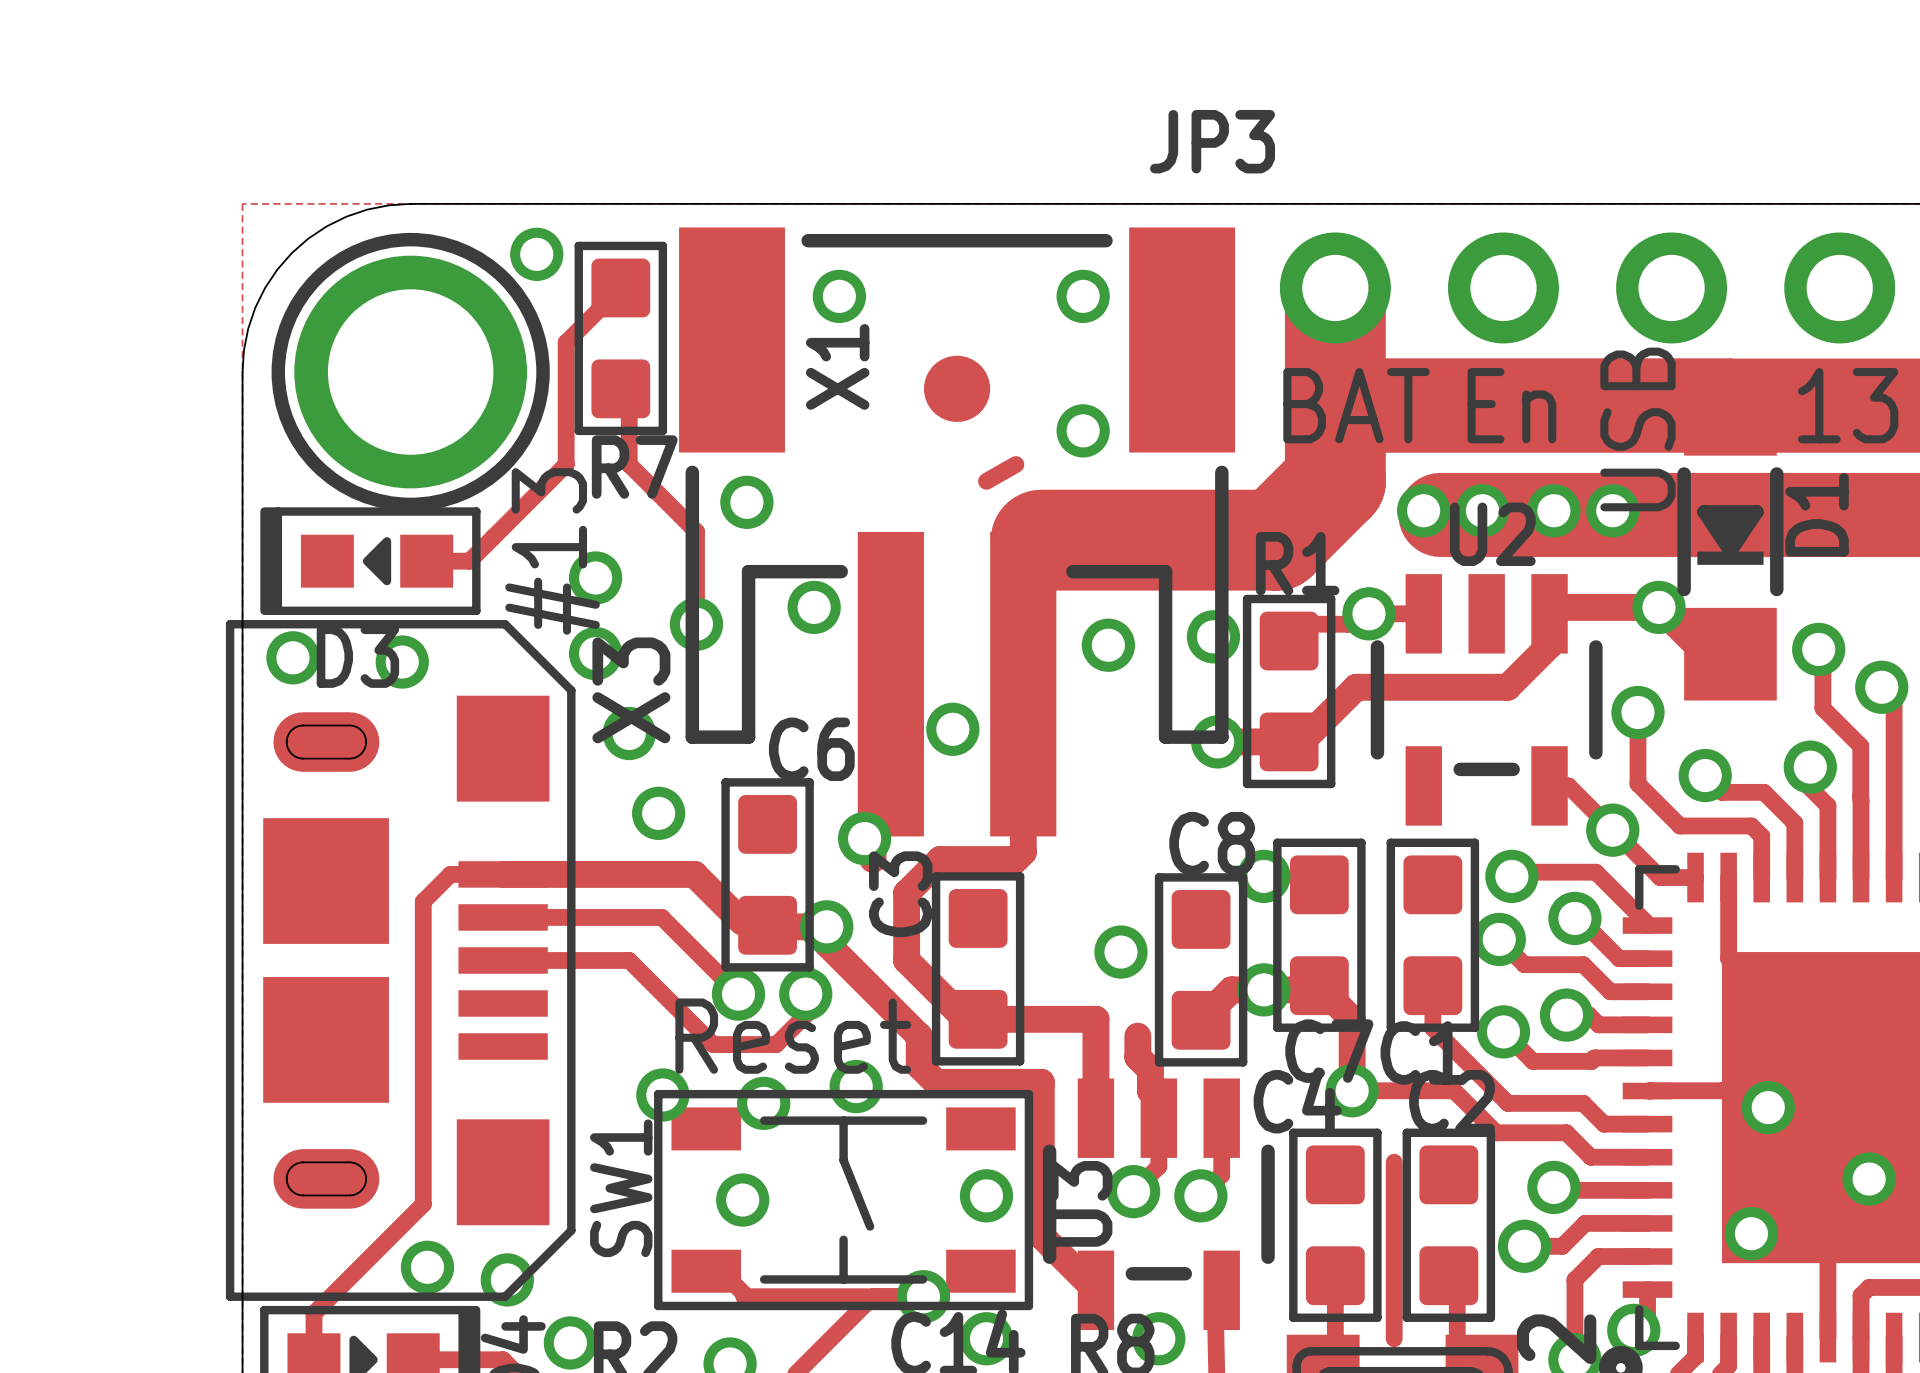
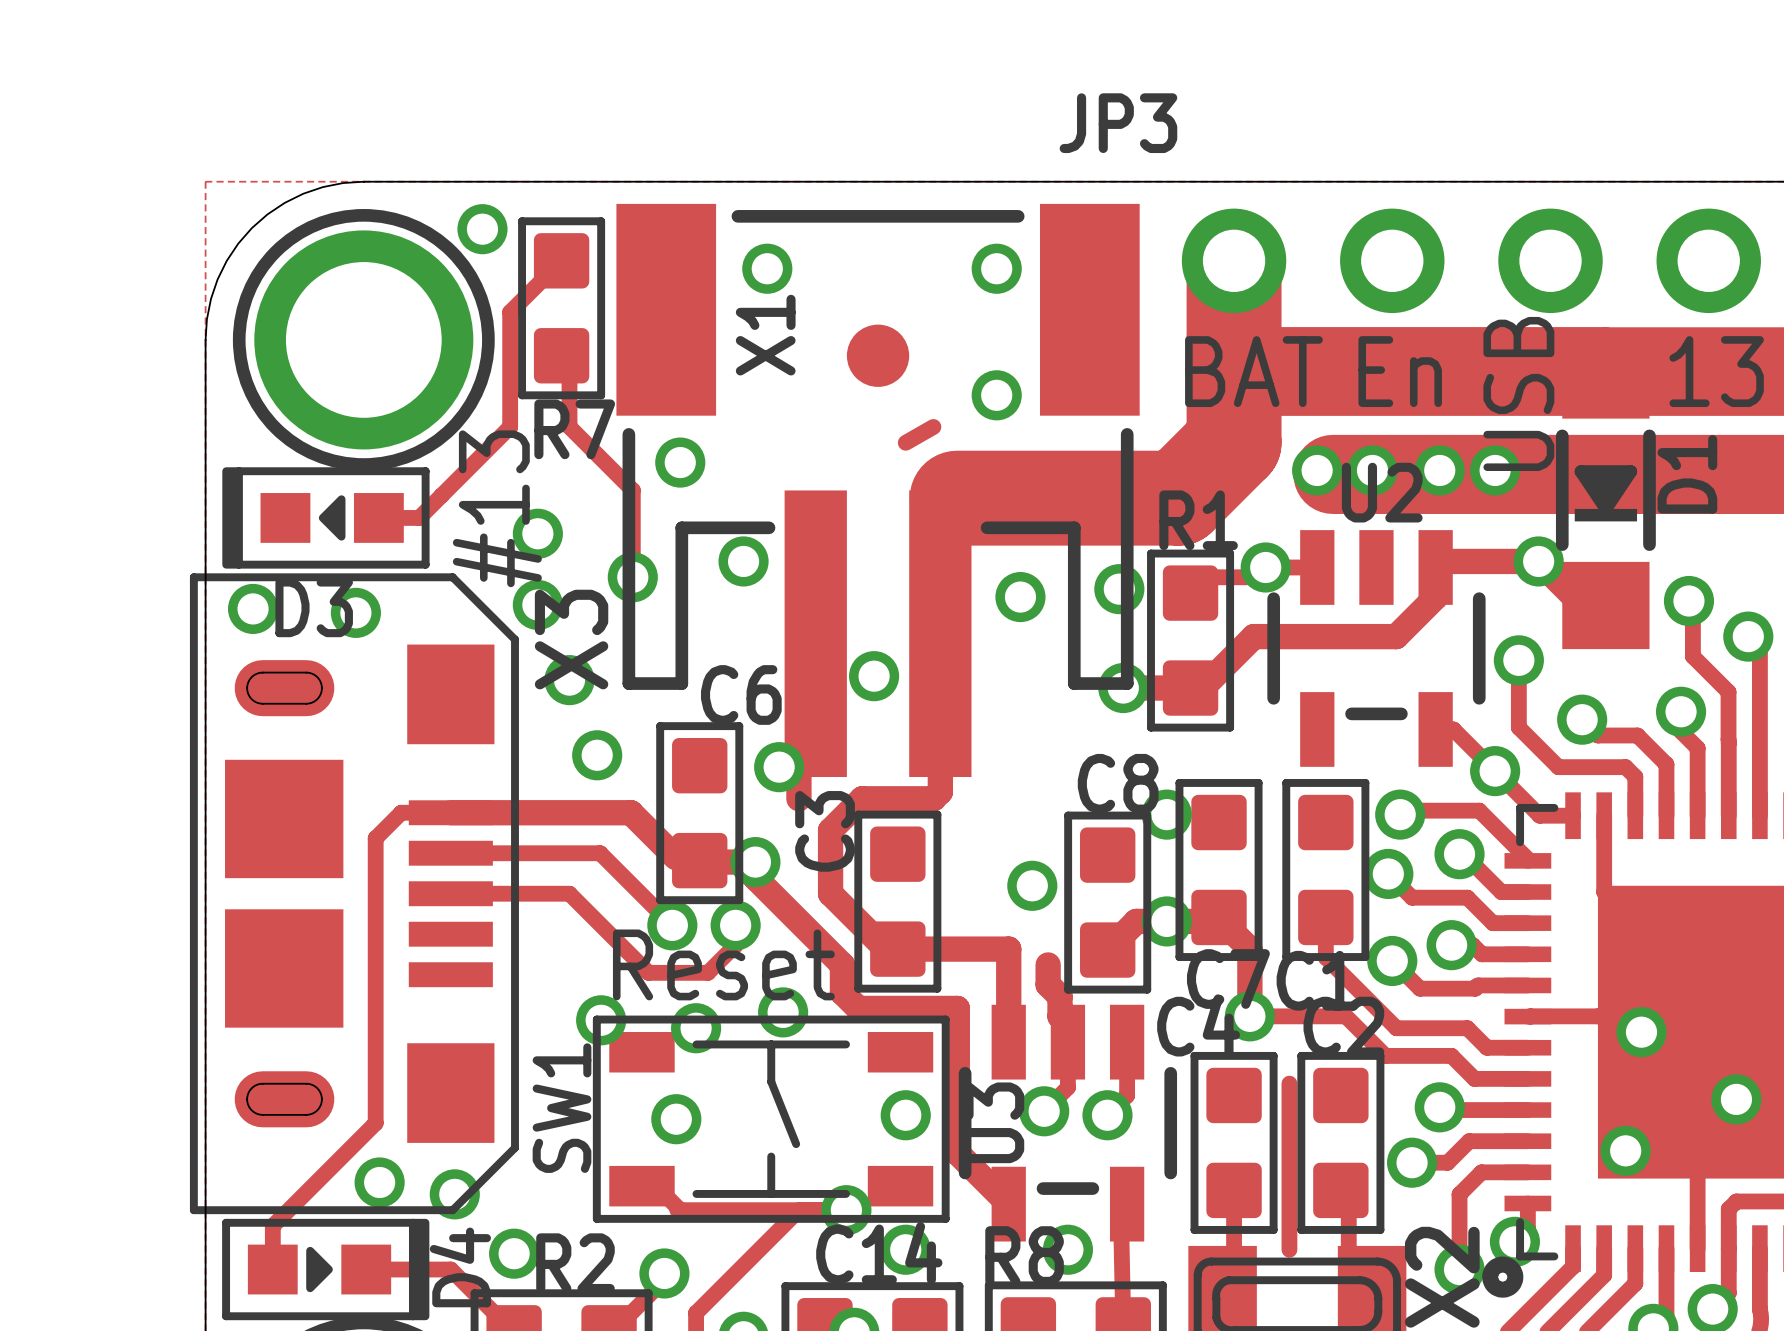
via position: (864, 838) -> (779, 767)

